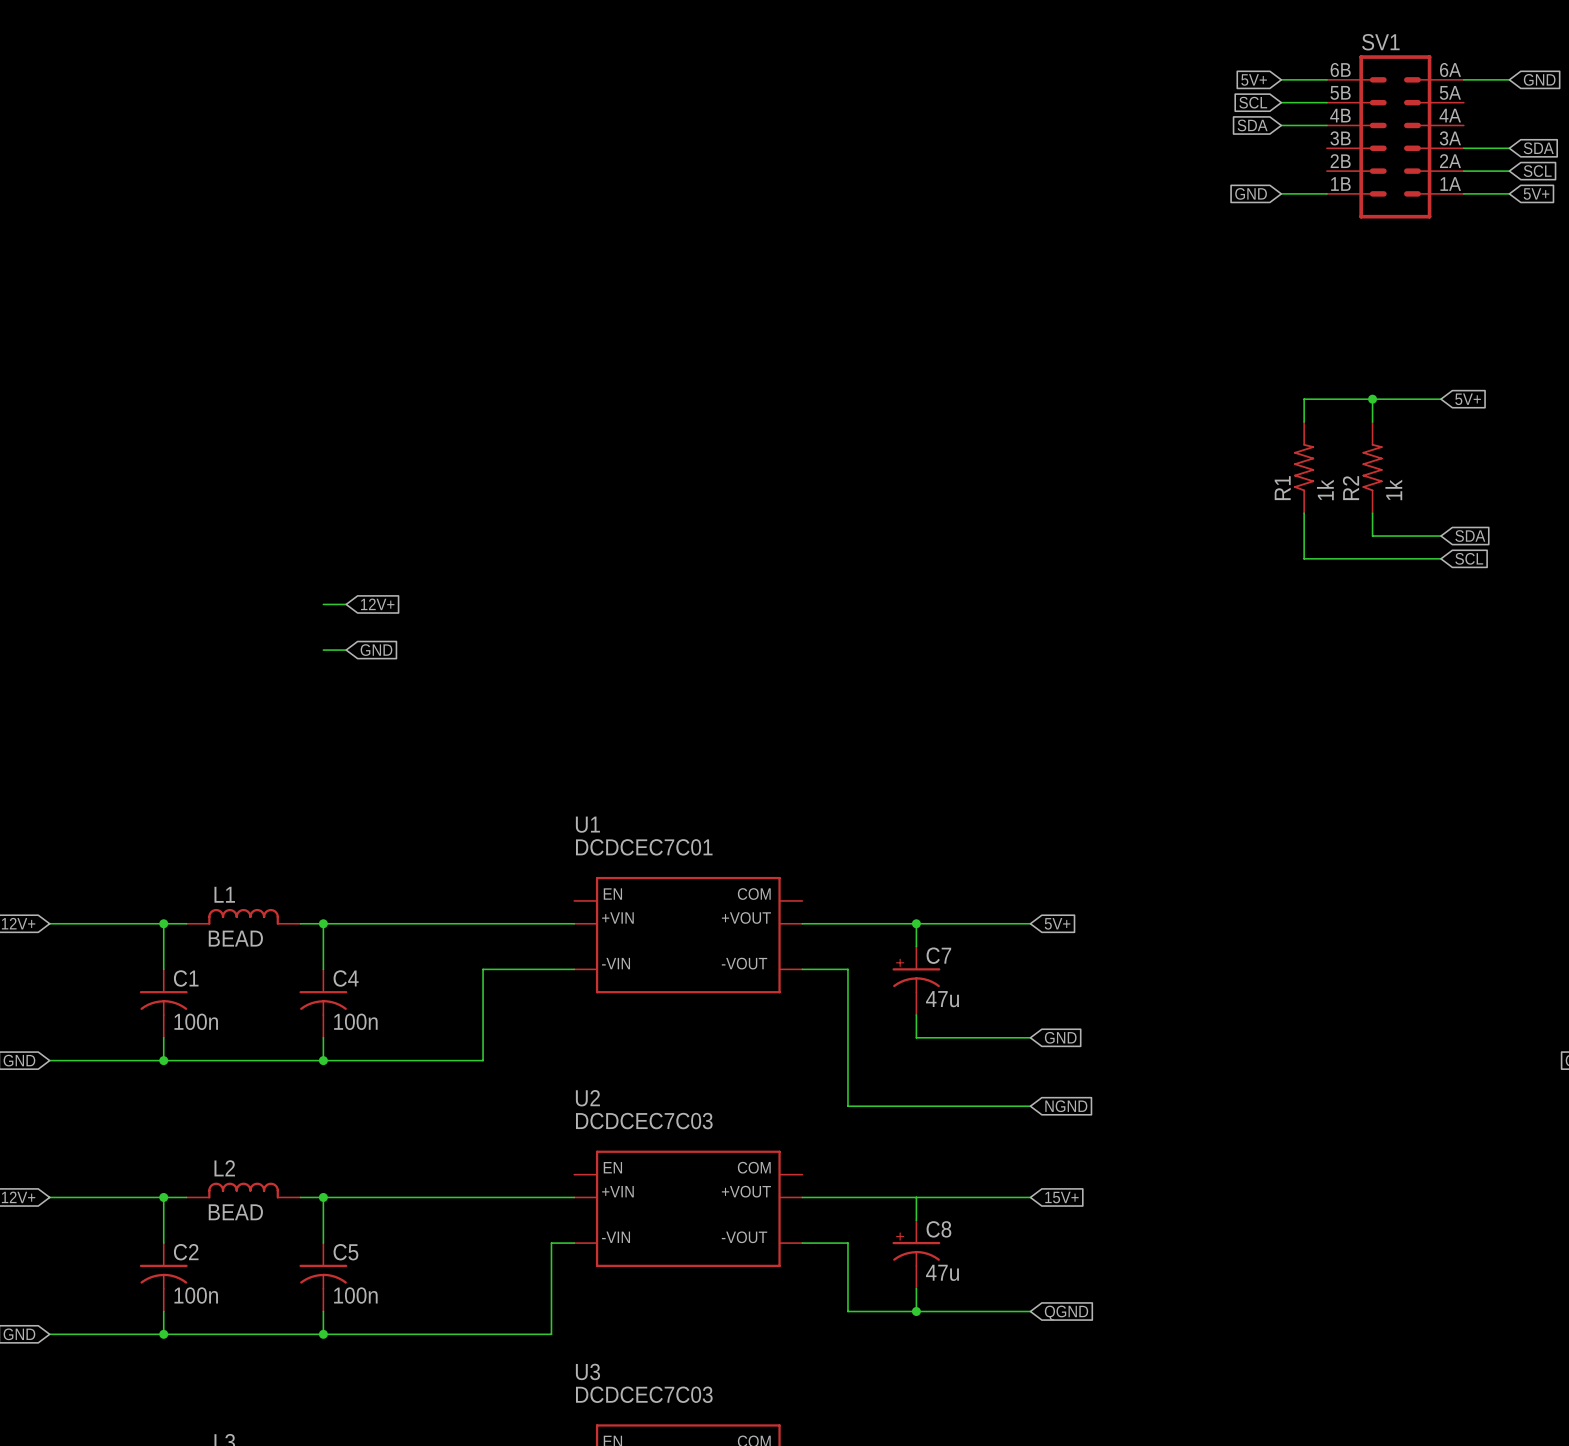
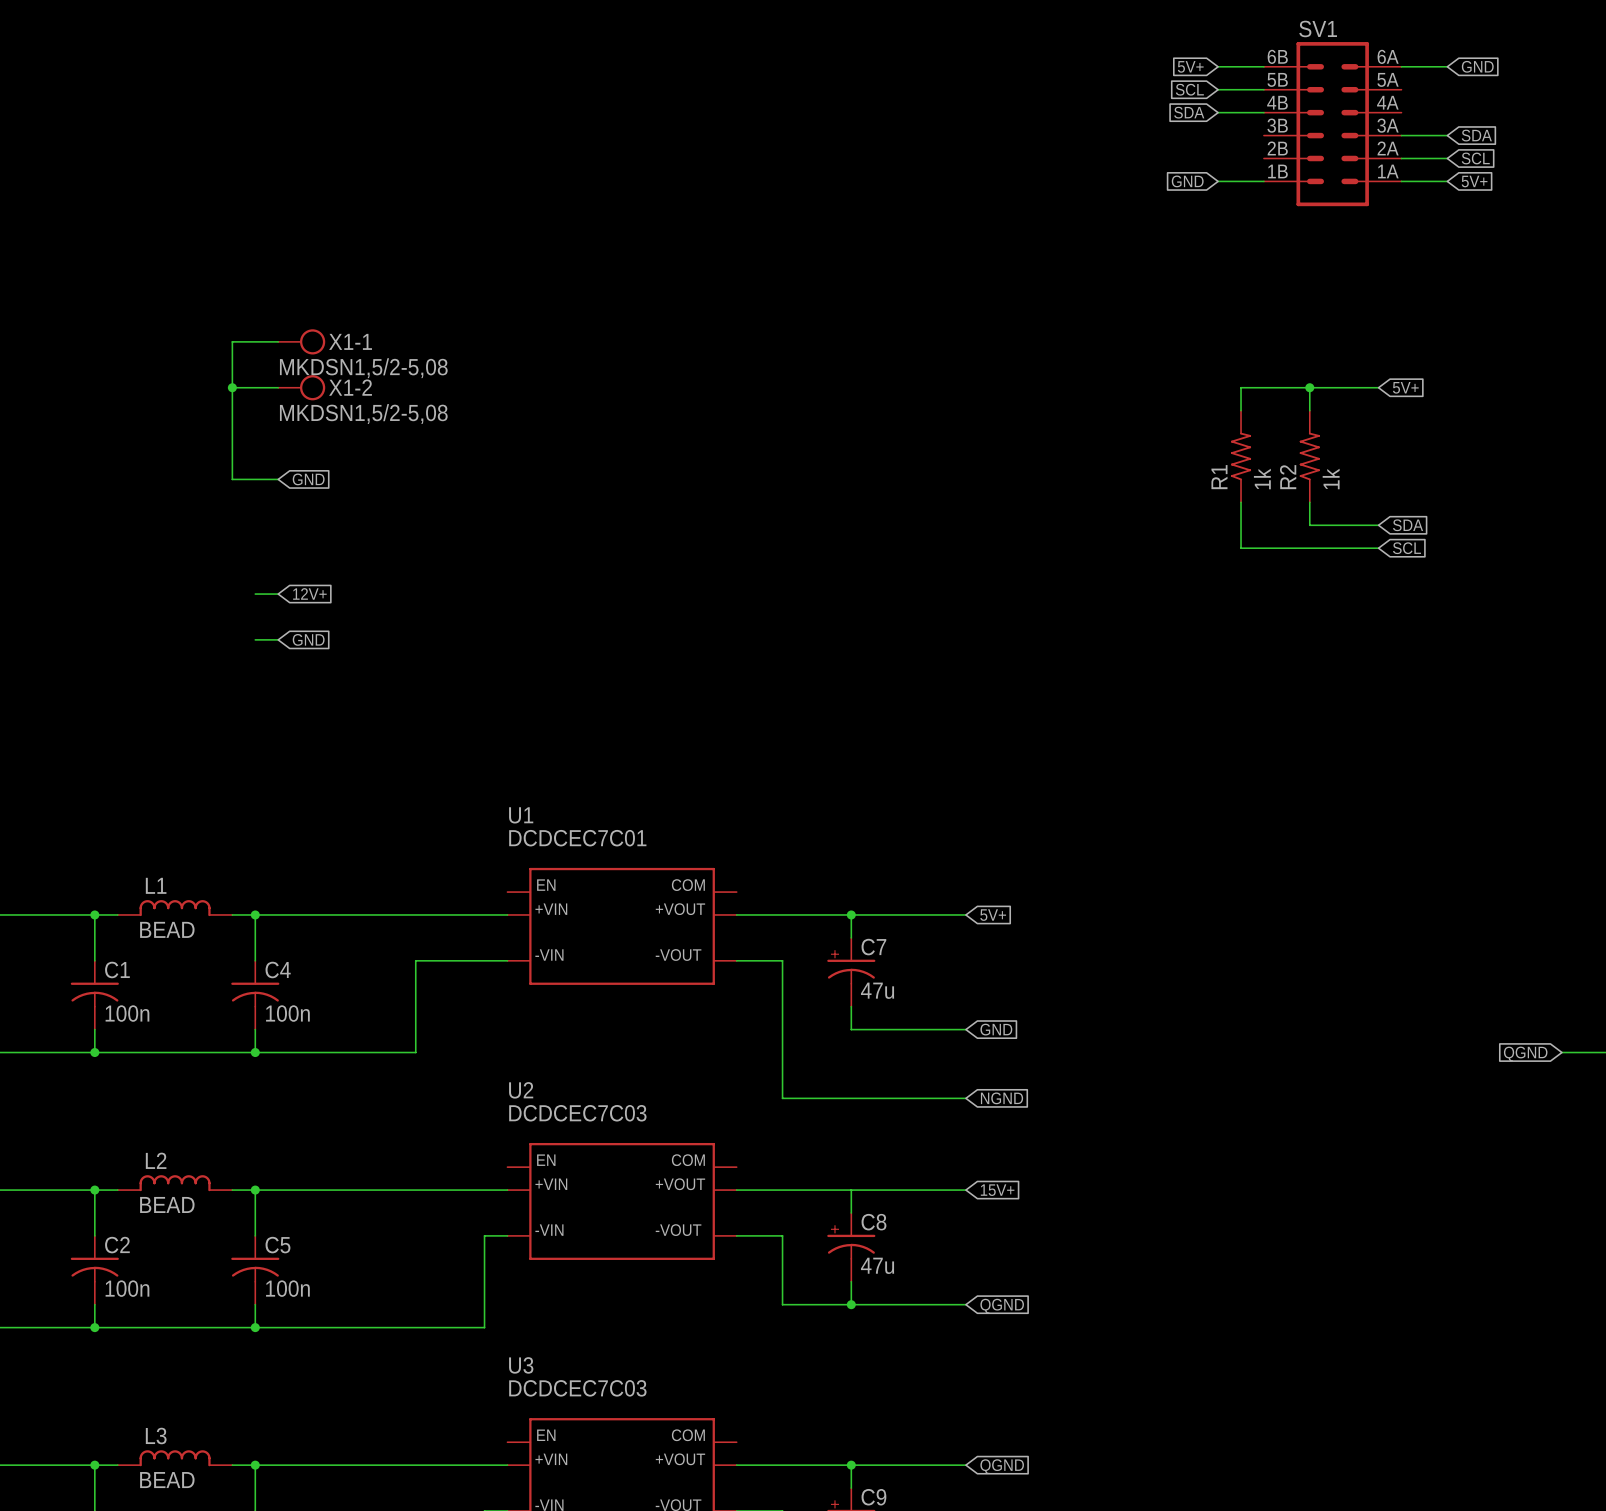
wire: none -> (278, 341) (232, 341) (232, 479) (278, 479)
X1-1: none -> MKDSN1,5/2-5,08 (301, 341)
wire: none -> (232, 387) (278, 387)
junction: none -> (232, 387)
X1-2: none -> MKDSN1,5/2-5,08 (301, 387)
global label: none -> GND (308, 479)

